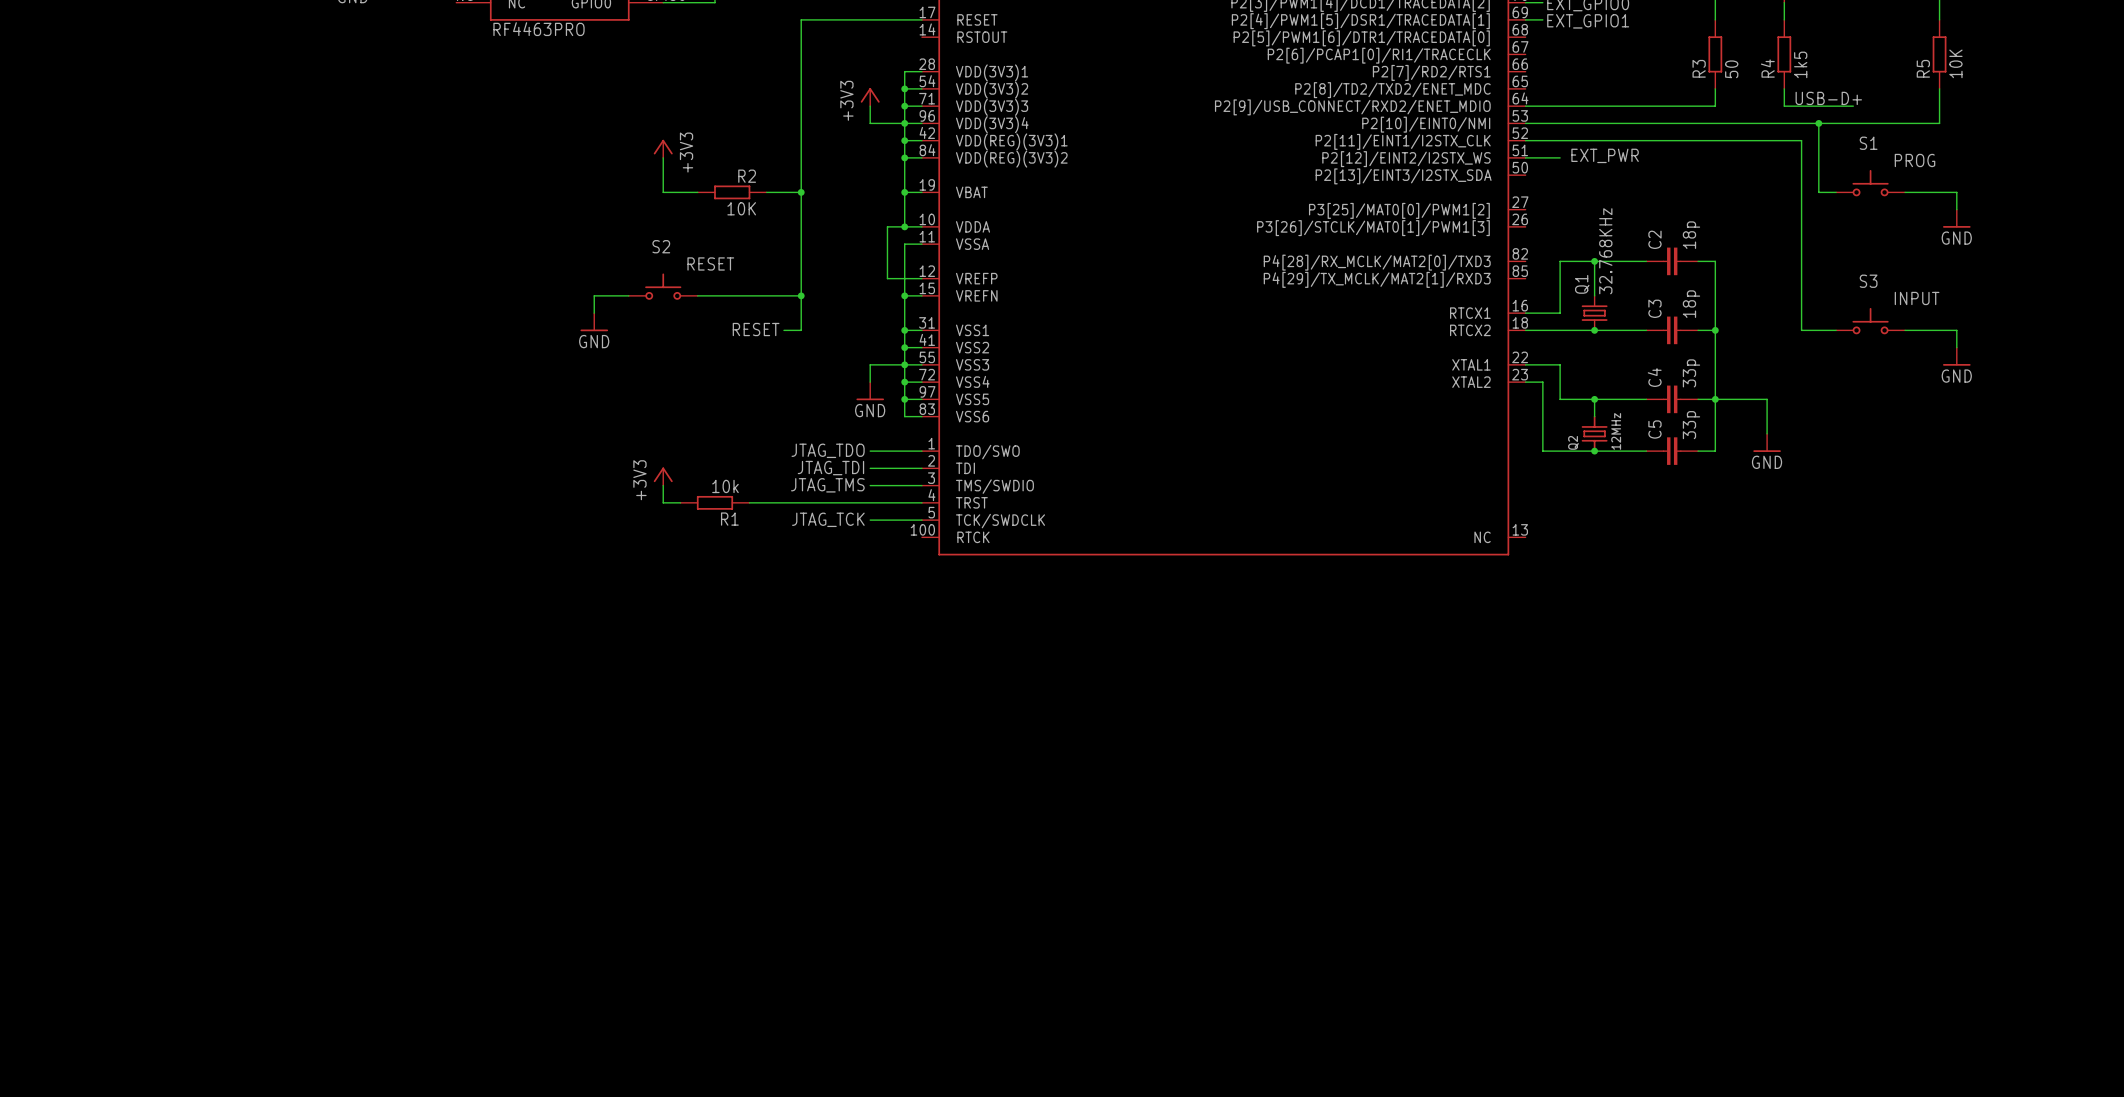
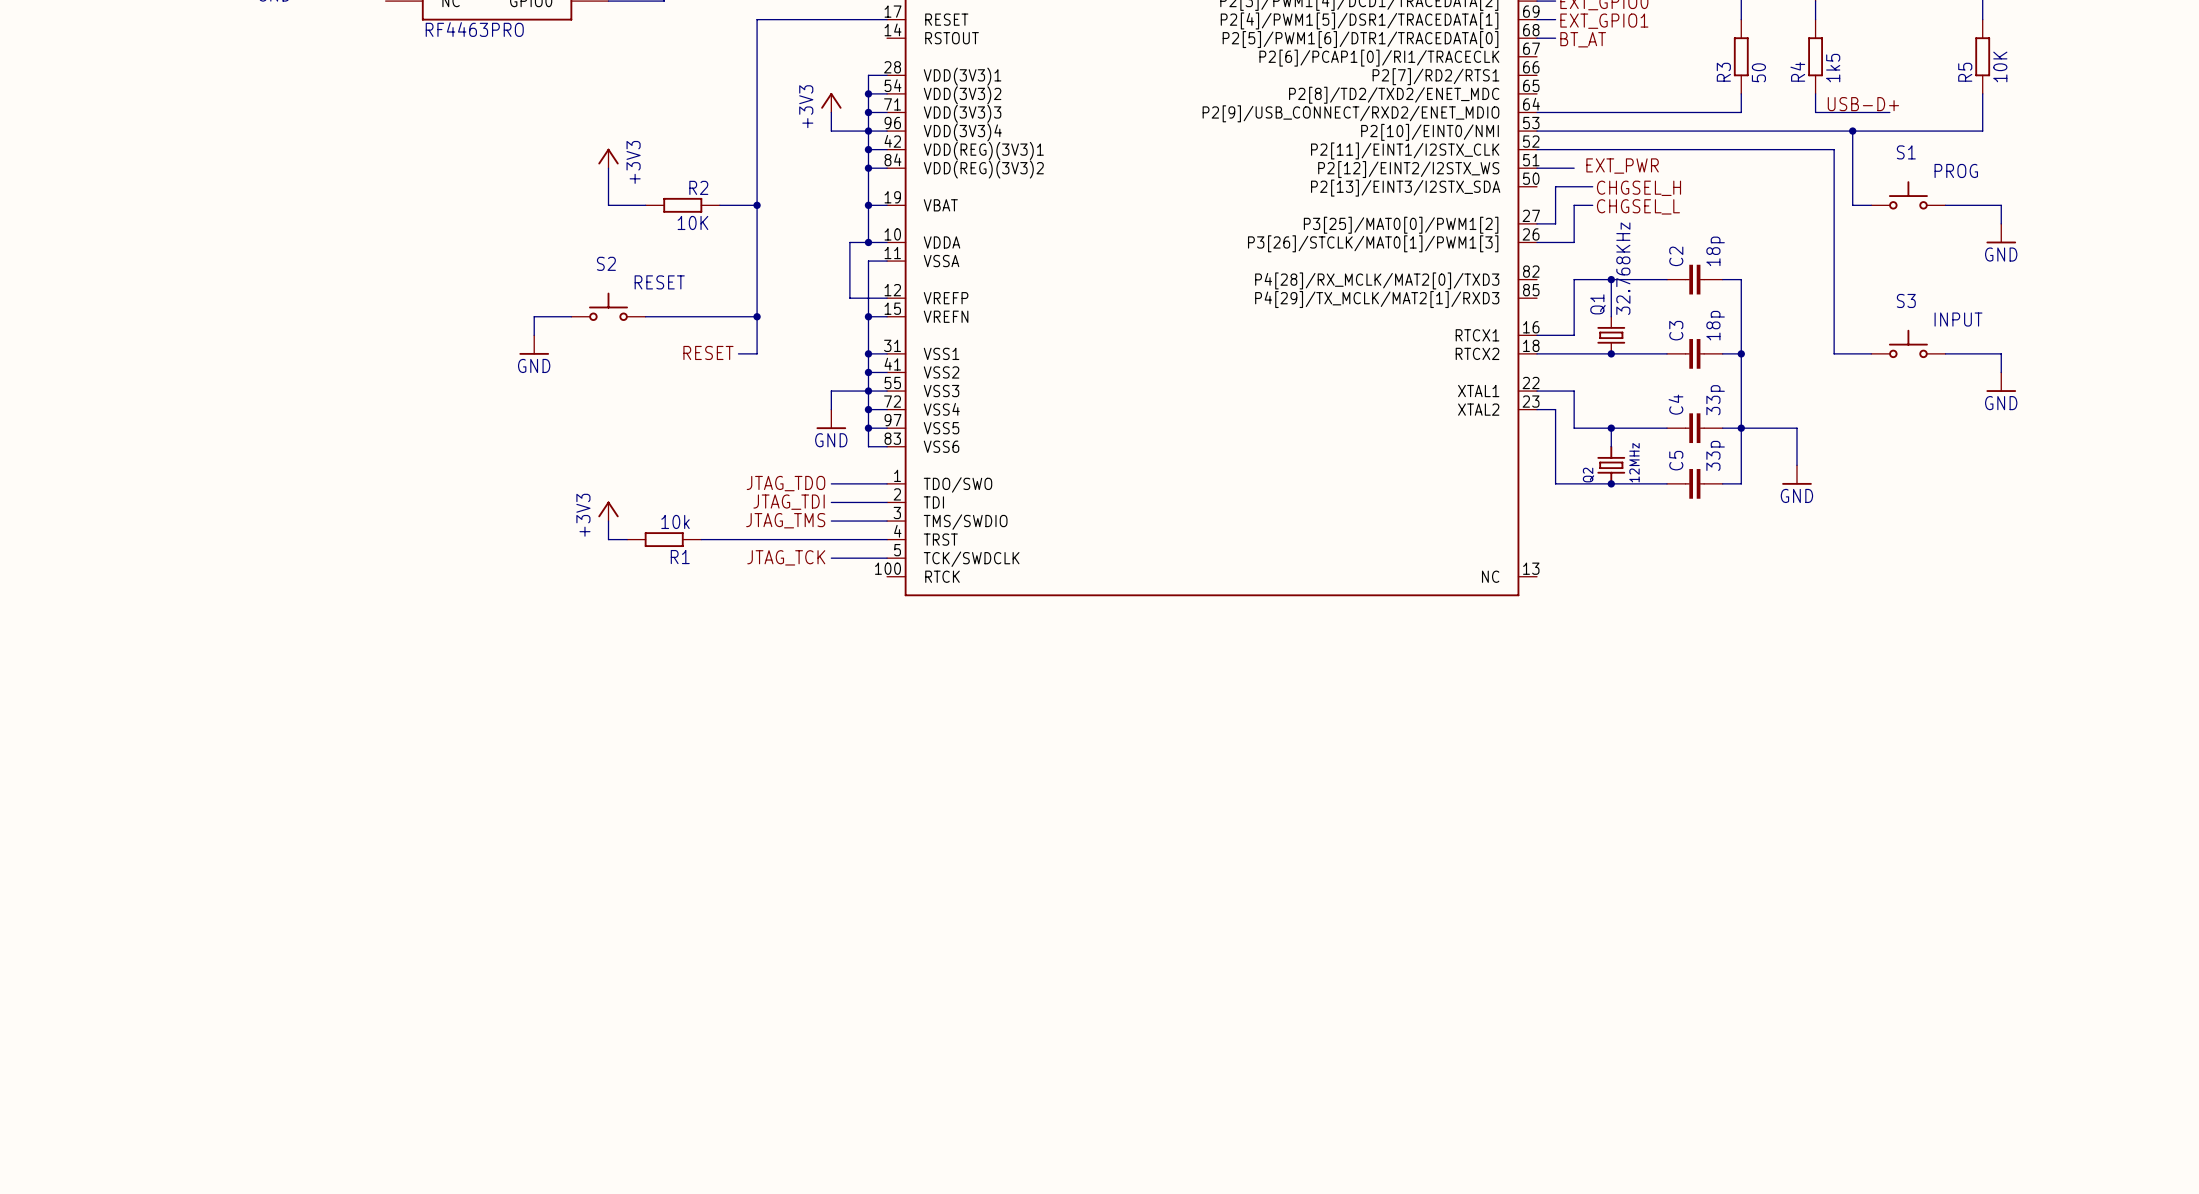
wire: none -> (1537, 38) (1555, 38)
label: none -> BT_AT (1583, 39)
wire: none -> (1592, 186) (1555, 186) (1555, 223) (1537, 223)
label: none -> CHGSEL_H (1638, 188)
wire: none -> (1592, 205) (1574, 205) (1574, 242) (1537, 242)
label: none -> CHGSEL_L (1638, 206)

